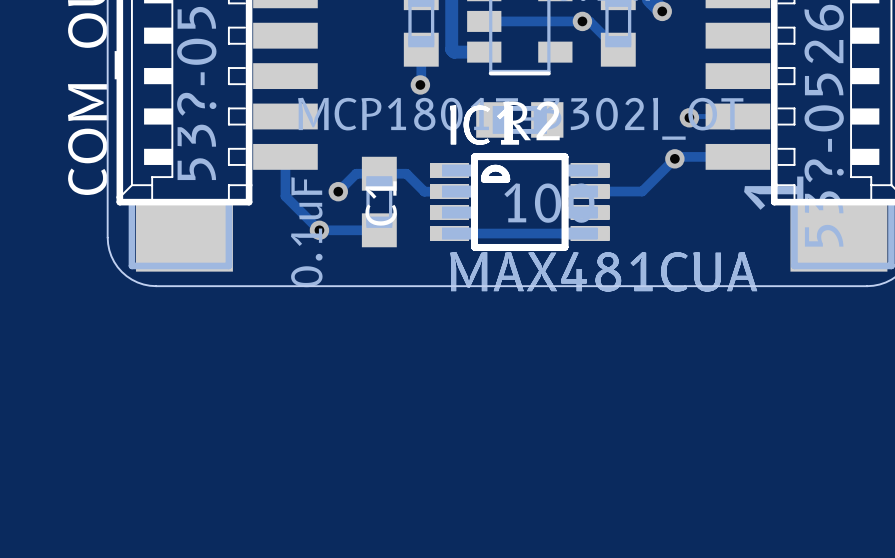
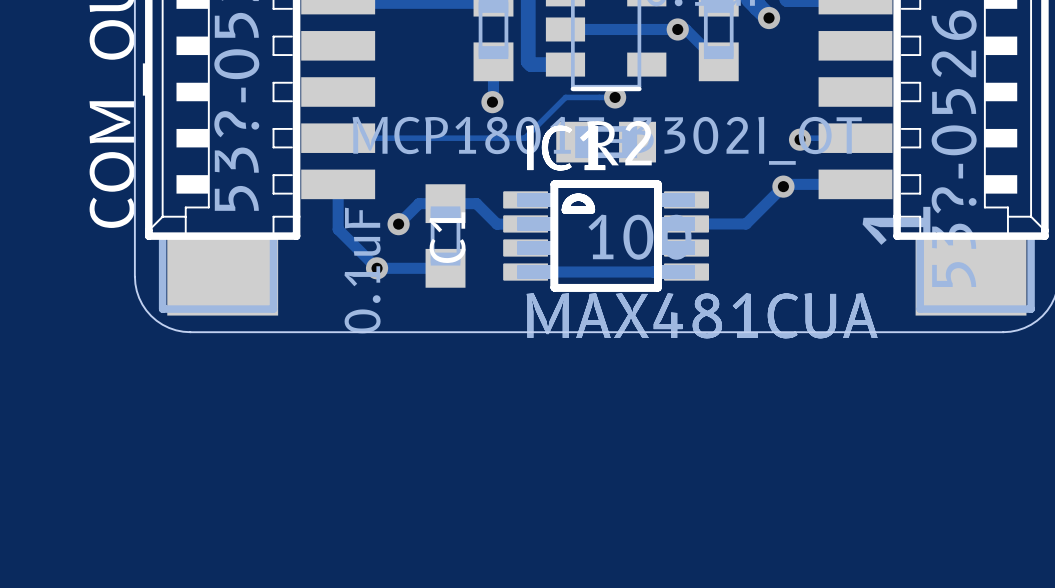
track: none -> (615, 97) (565, 97) (524, 138) (338, 138)
via: none -> (615, 97)

